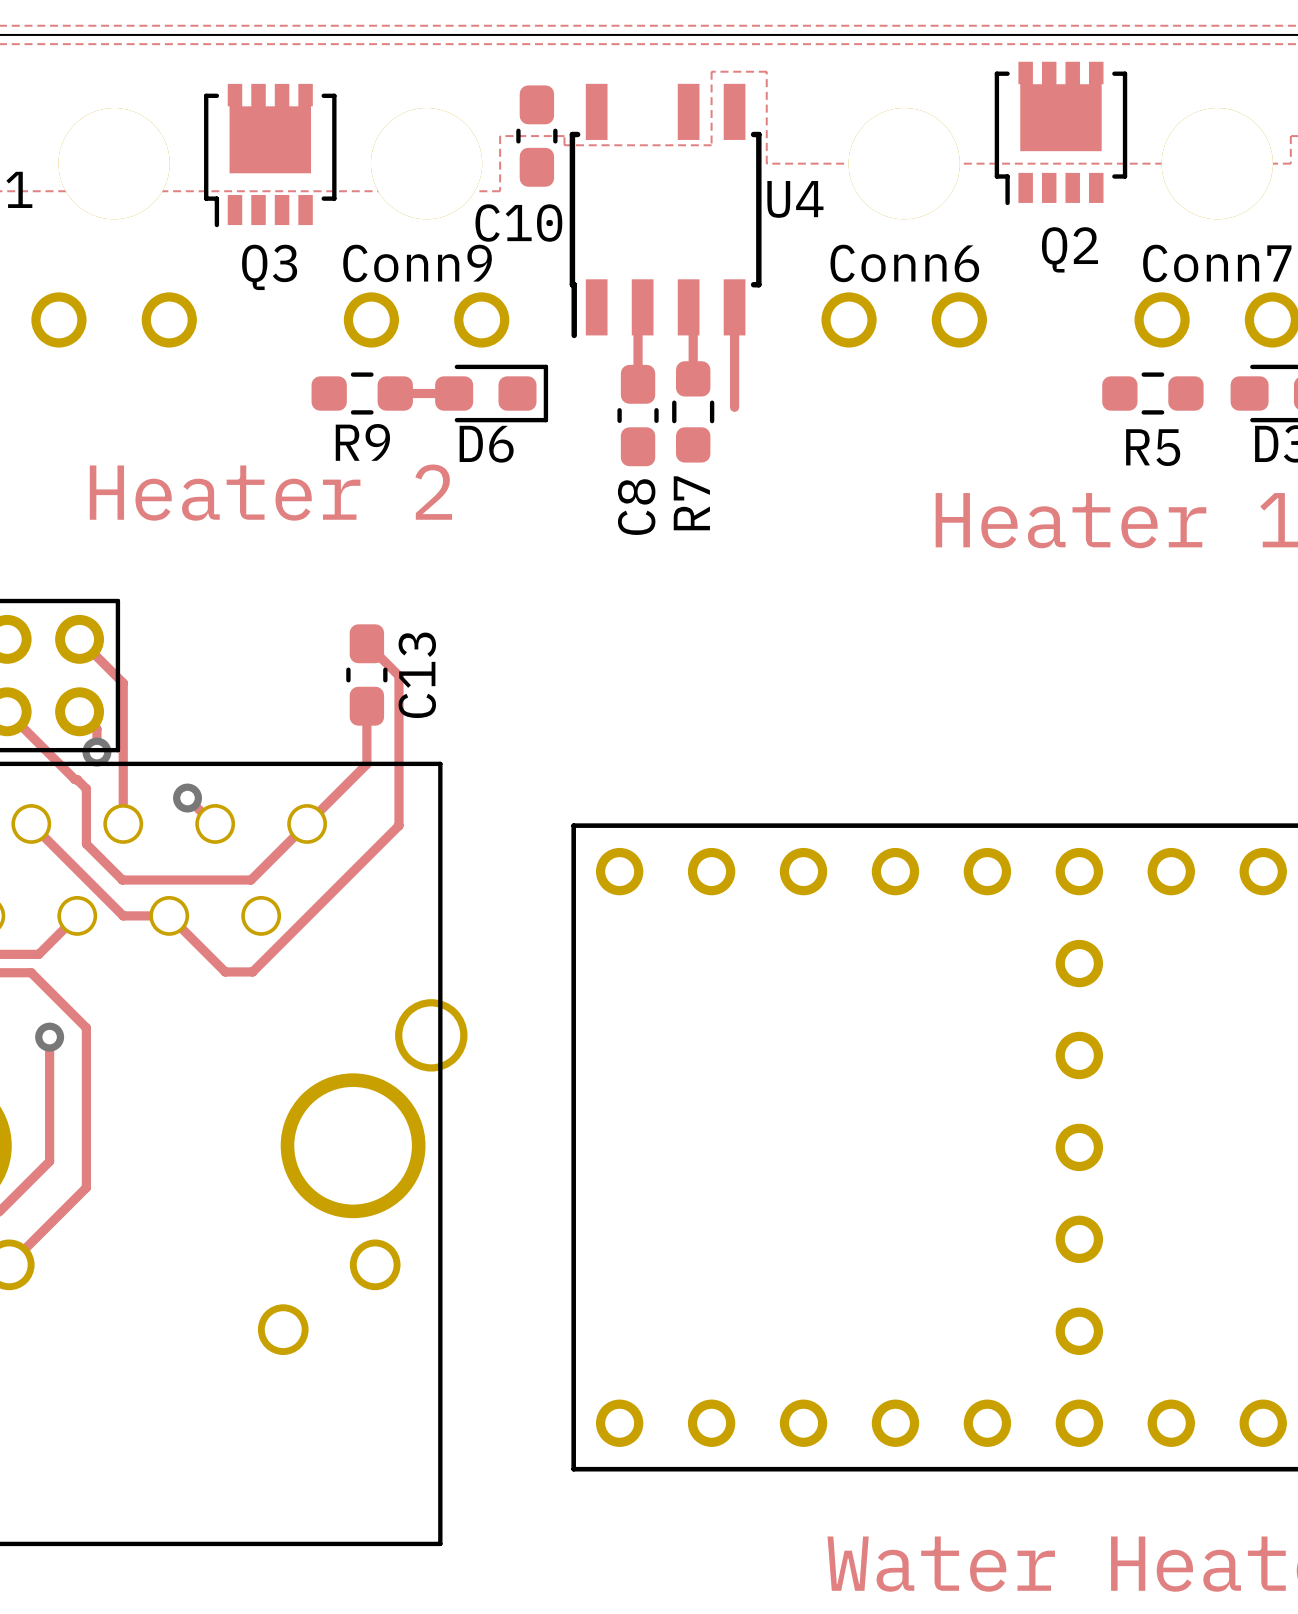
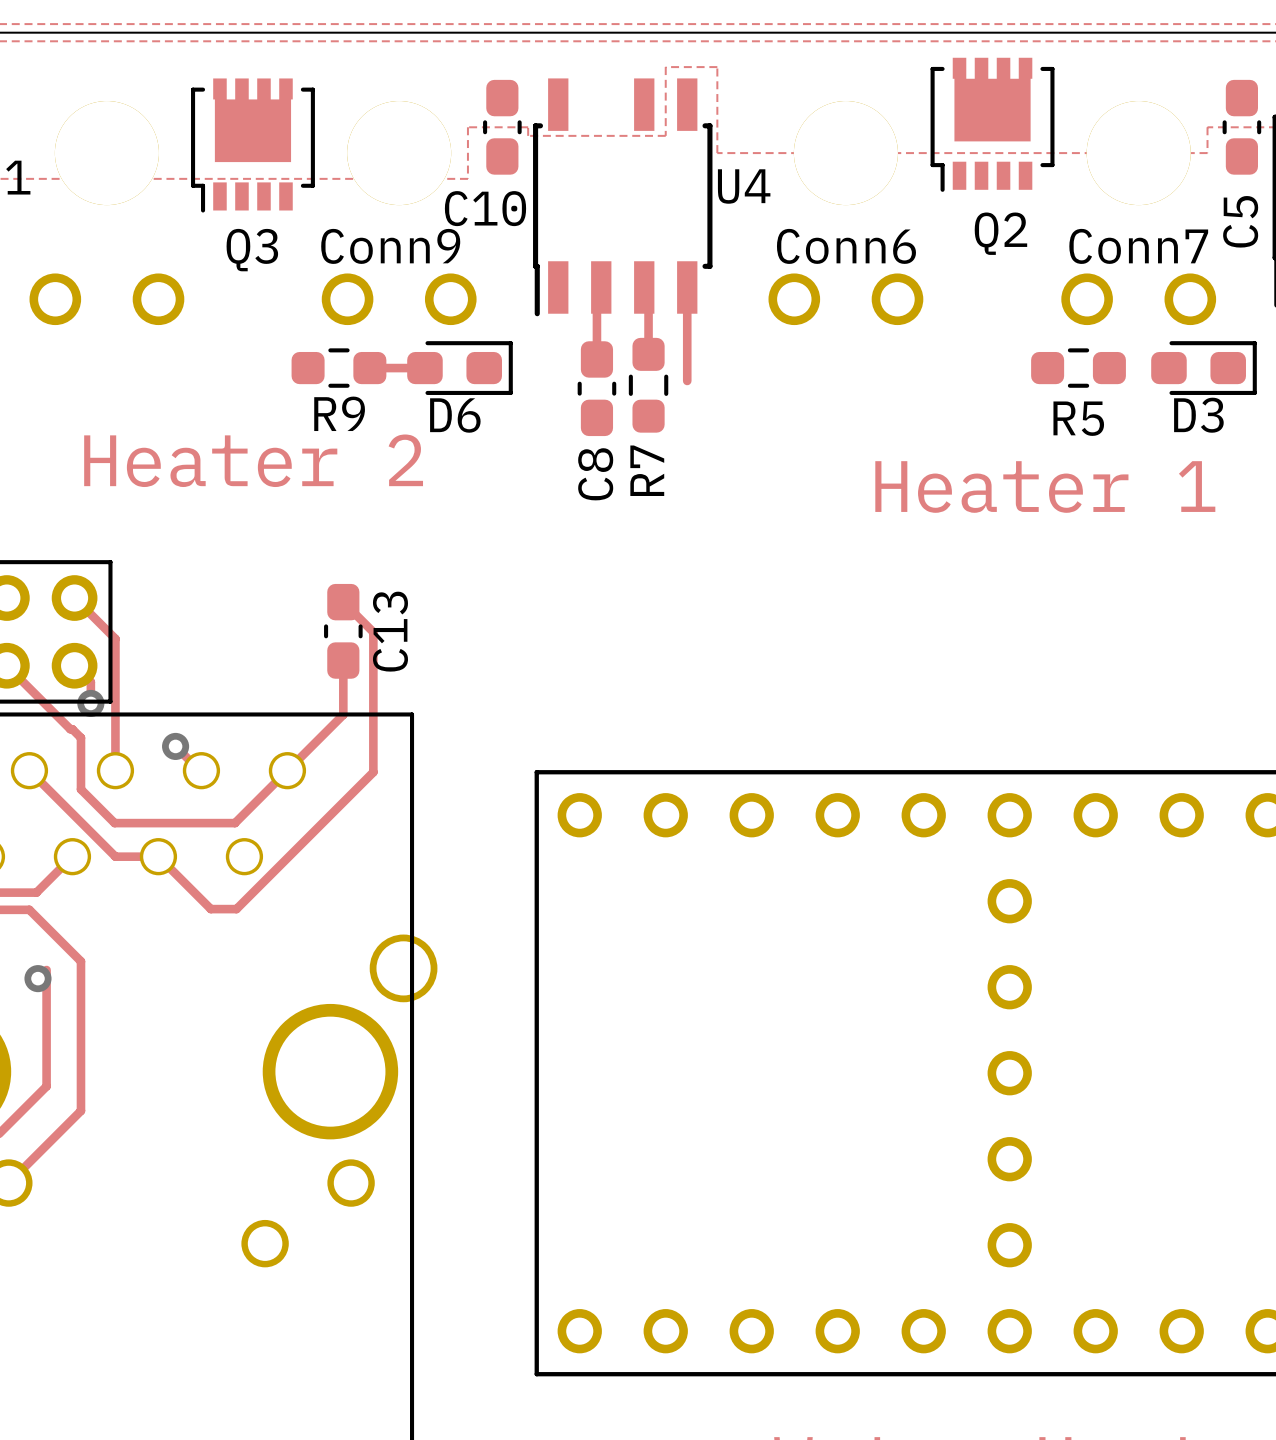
via position: (49, 1037) -> (37, 978)

